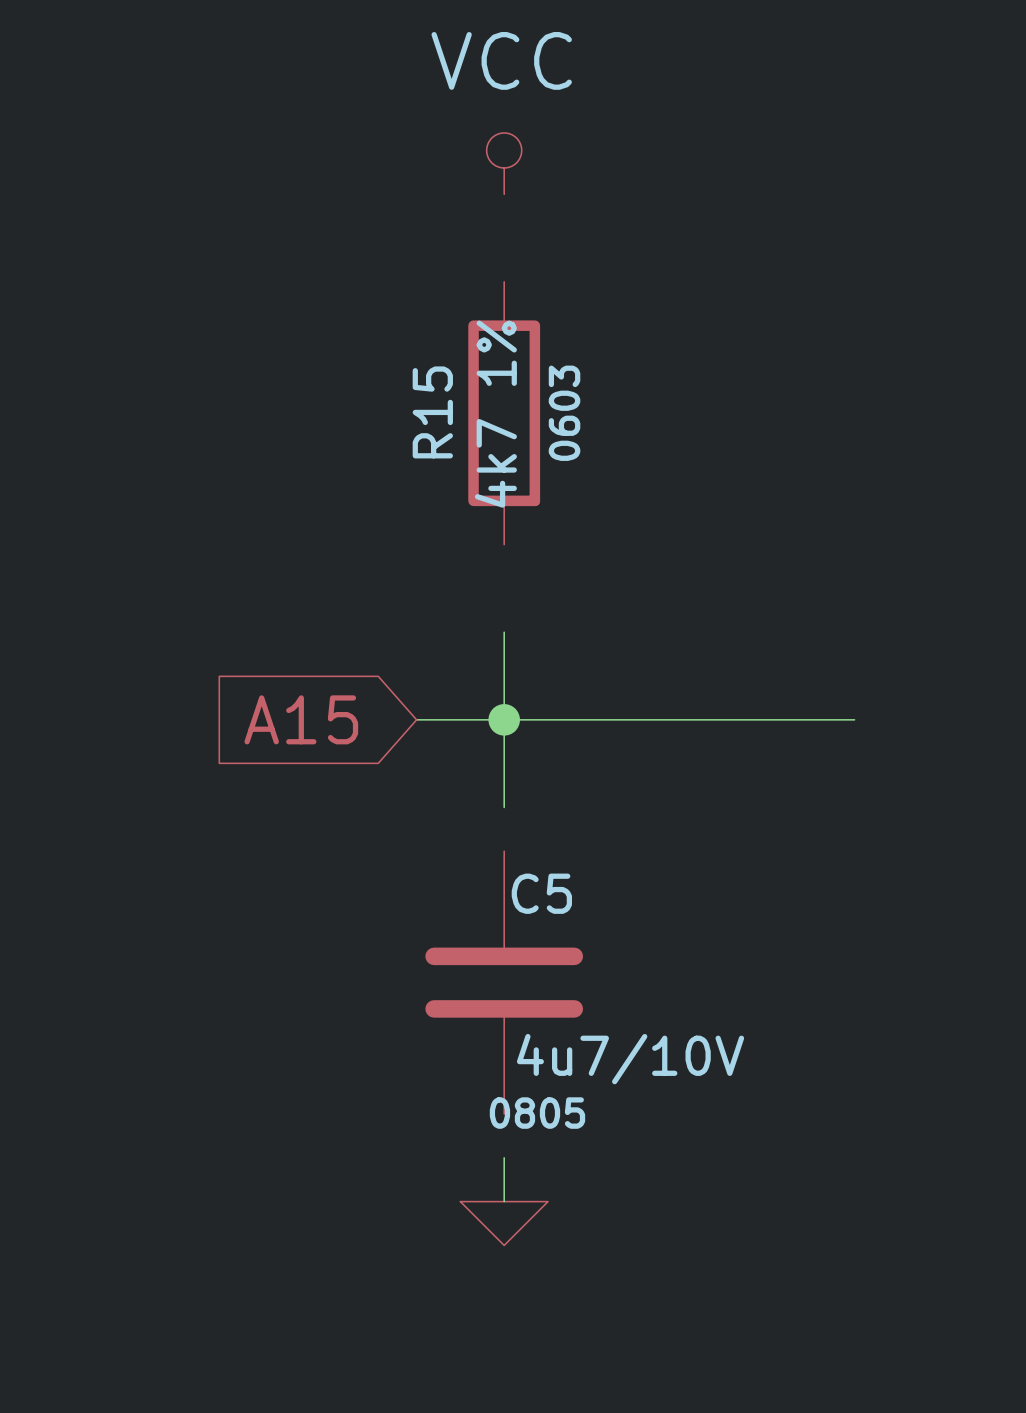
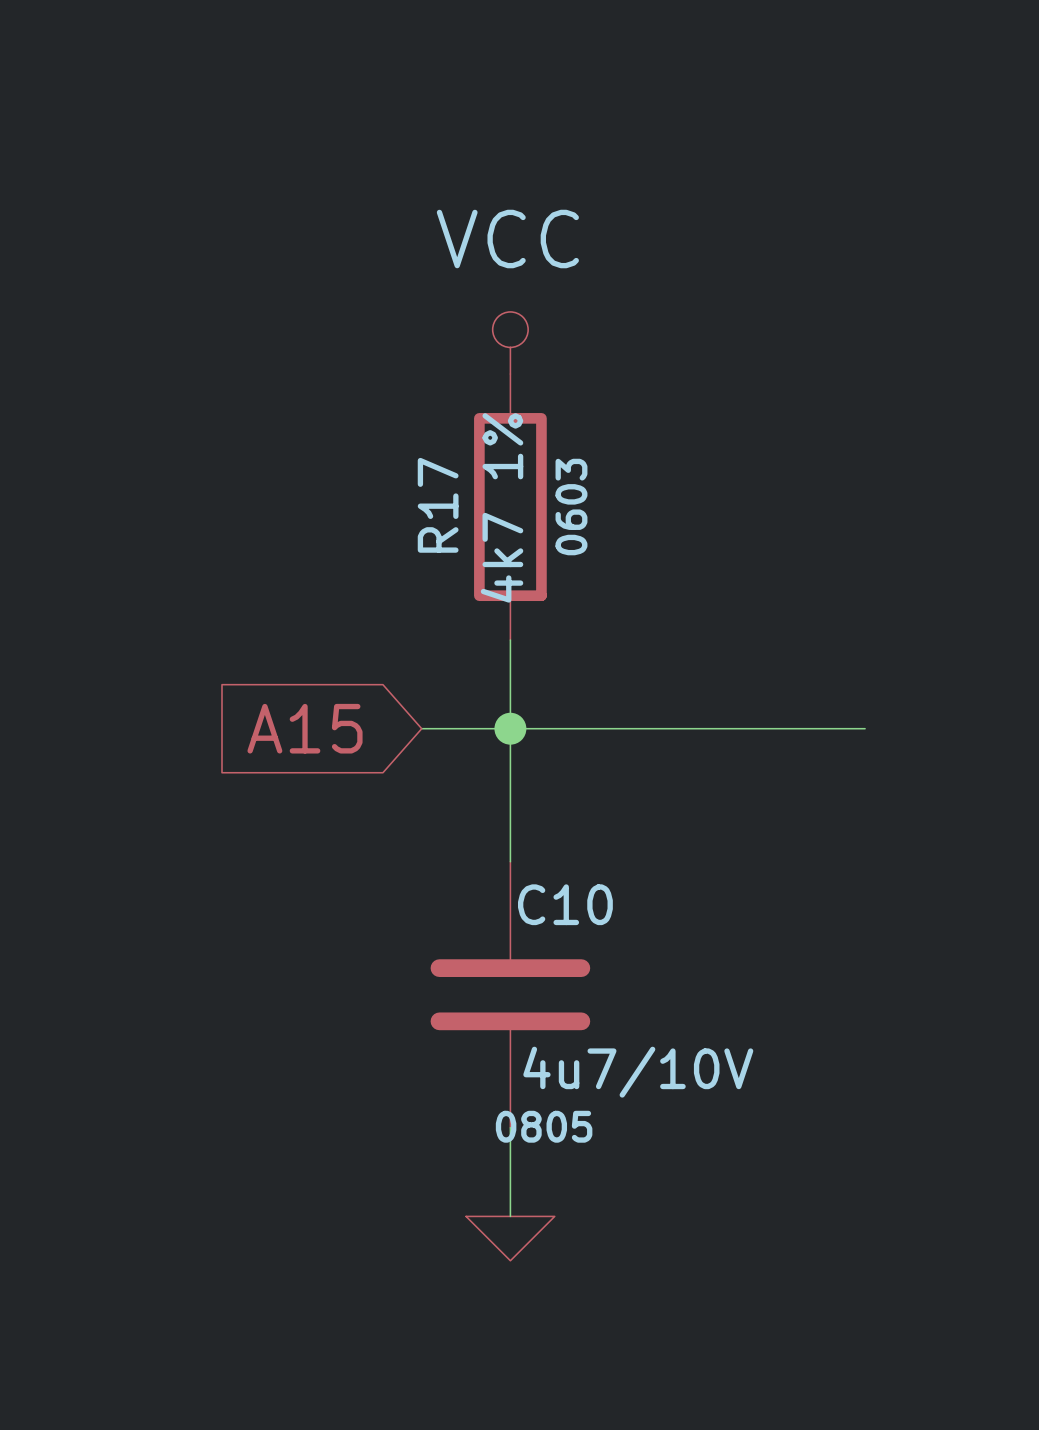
power symbol position: VCC (504, 163) -> VCC (510, 342)
R15: 4k7 1% (504, 413) -> none
R17: none -> 4k7 1% (510, 507)
wire: none -> (510, 817) (510, 861)
C5 name: C5 (541, 893) -> C10 (565, 904)
wire: none -> (510, 1127) (510, 1172)

